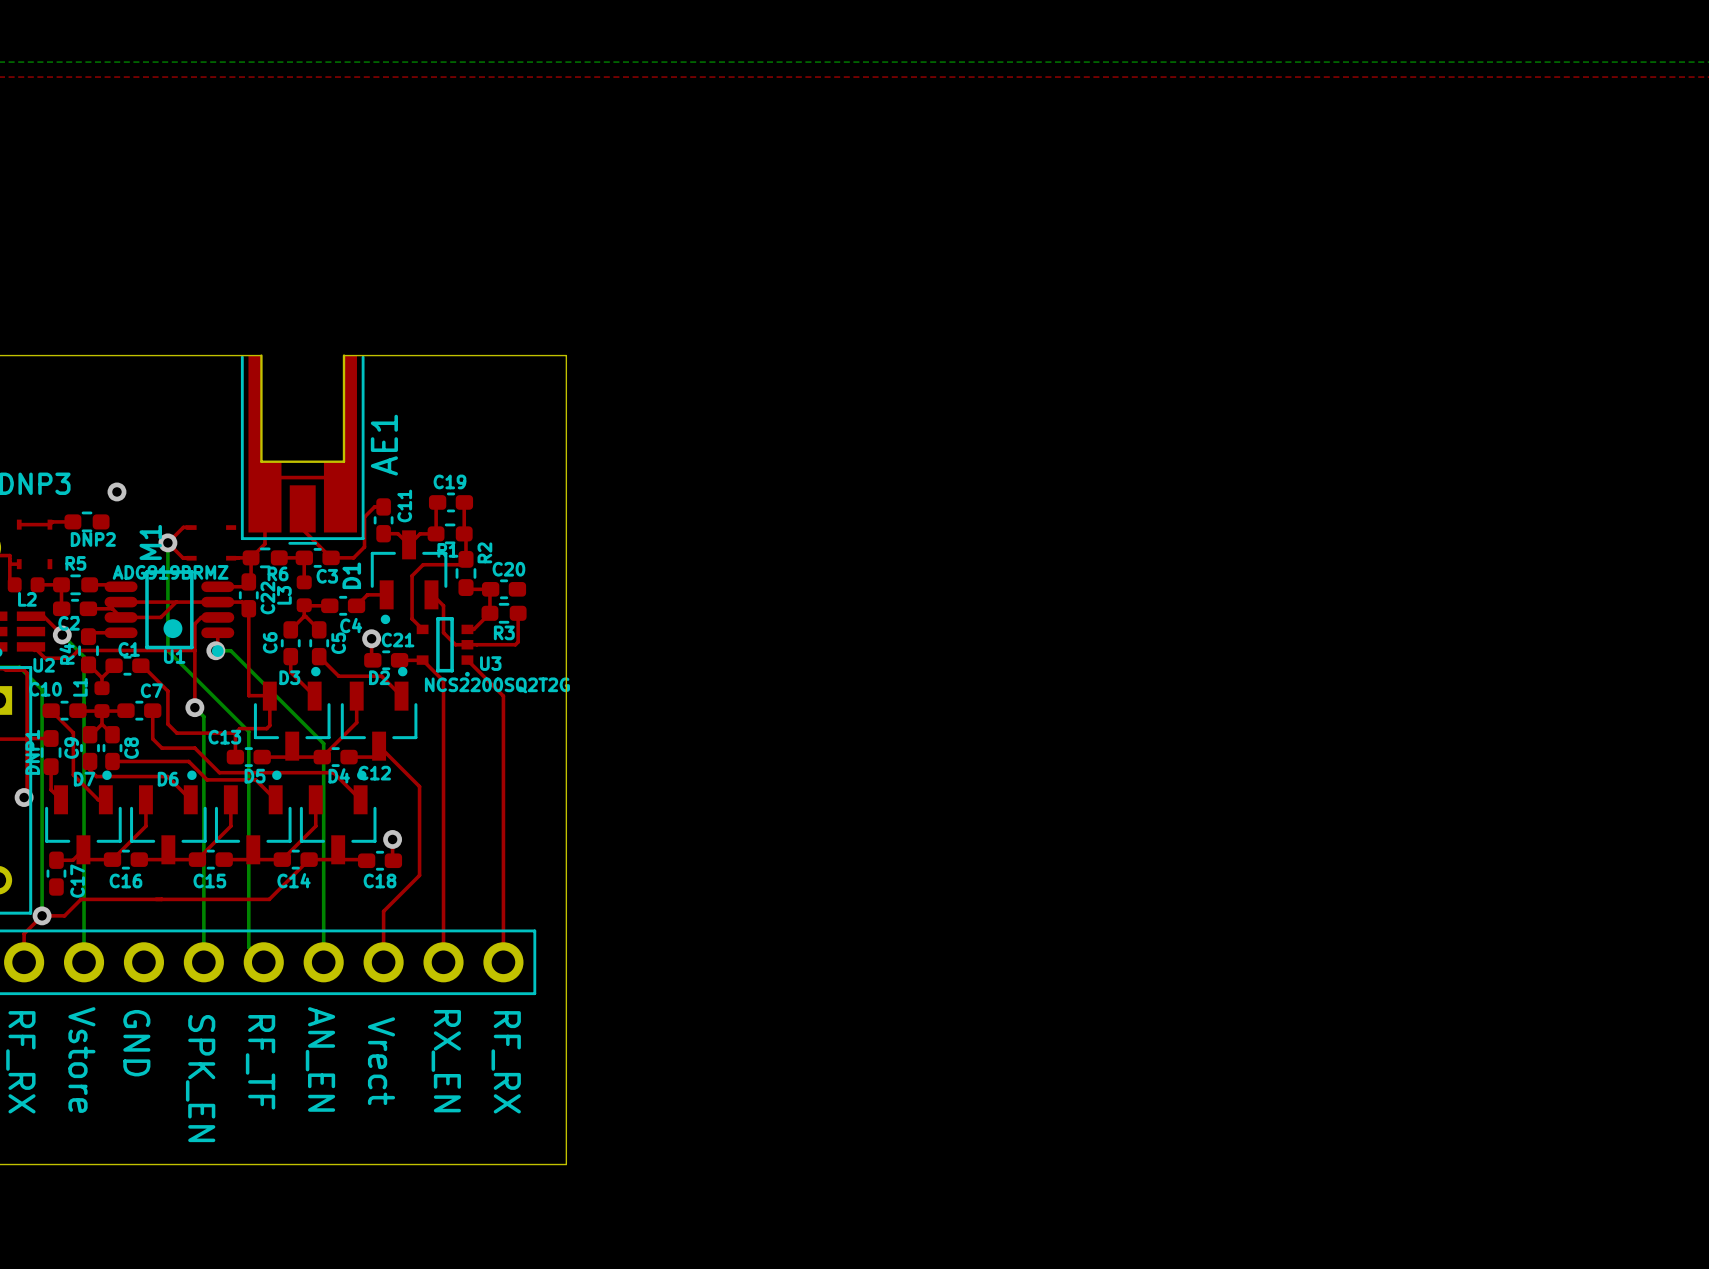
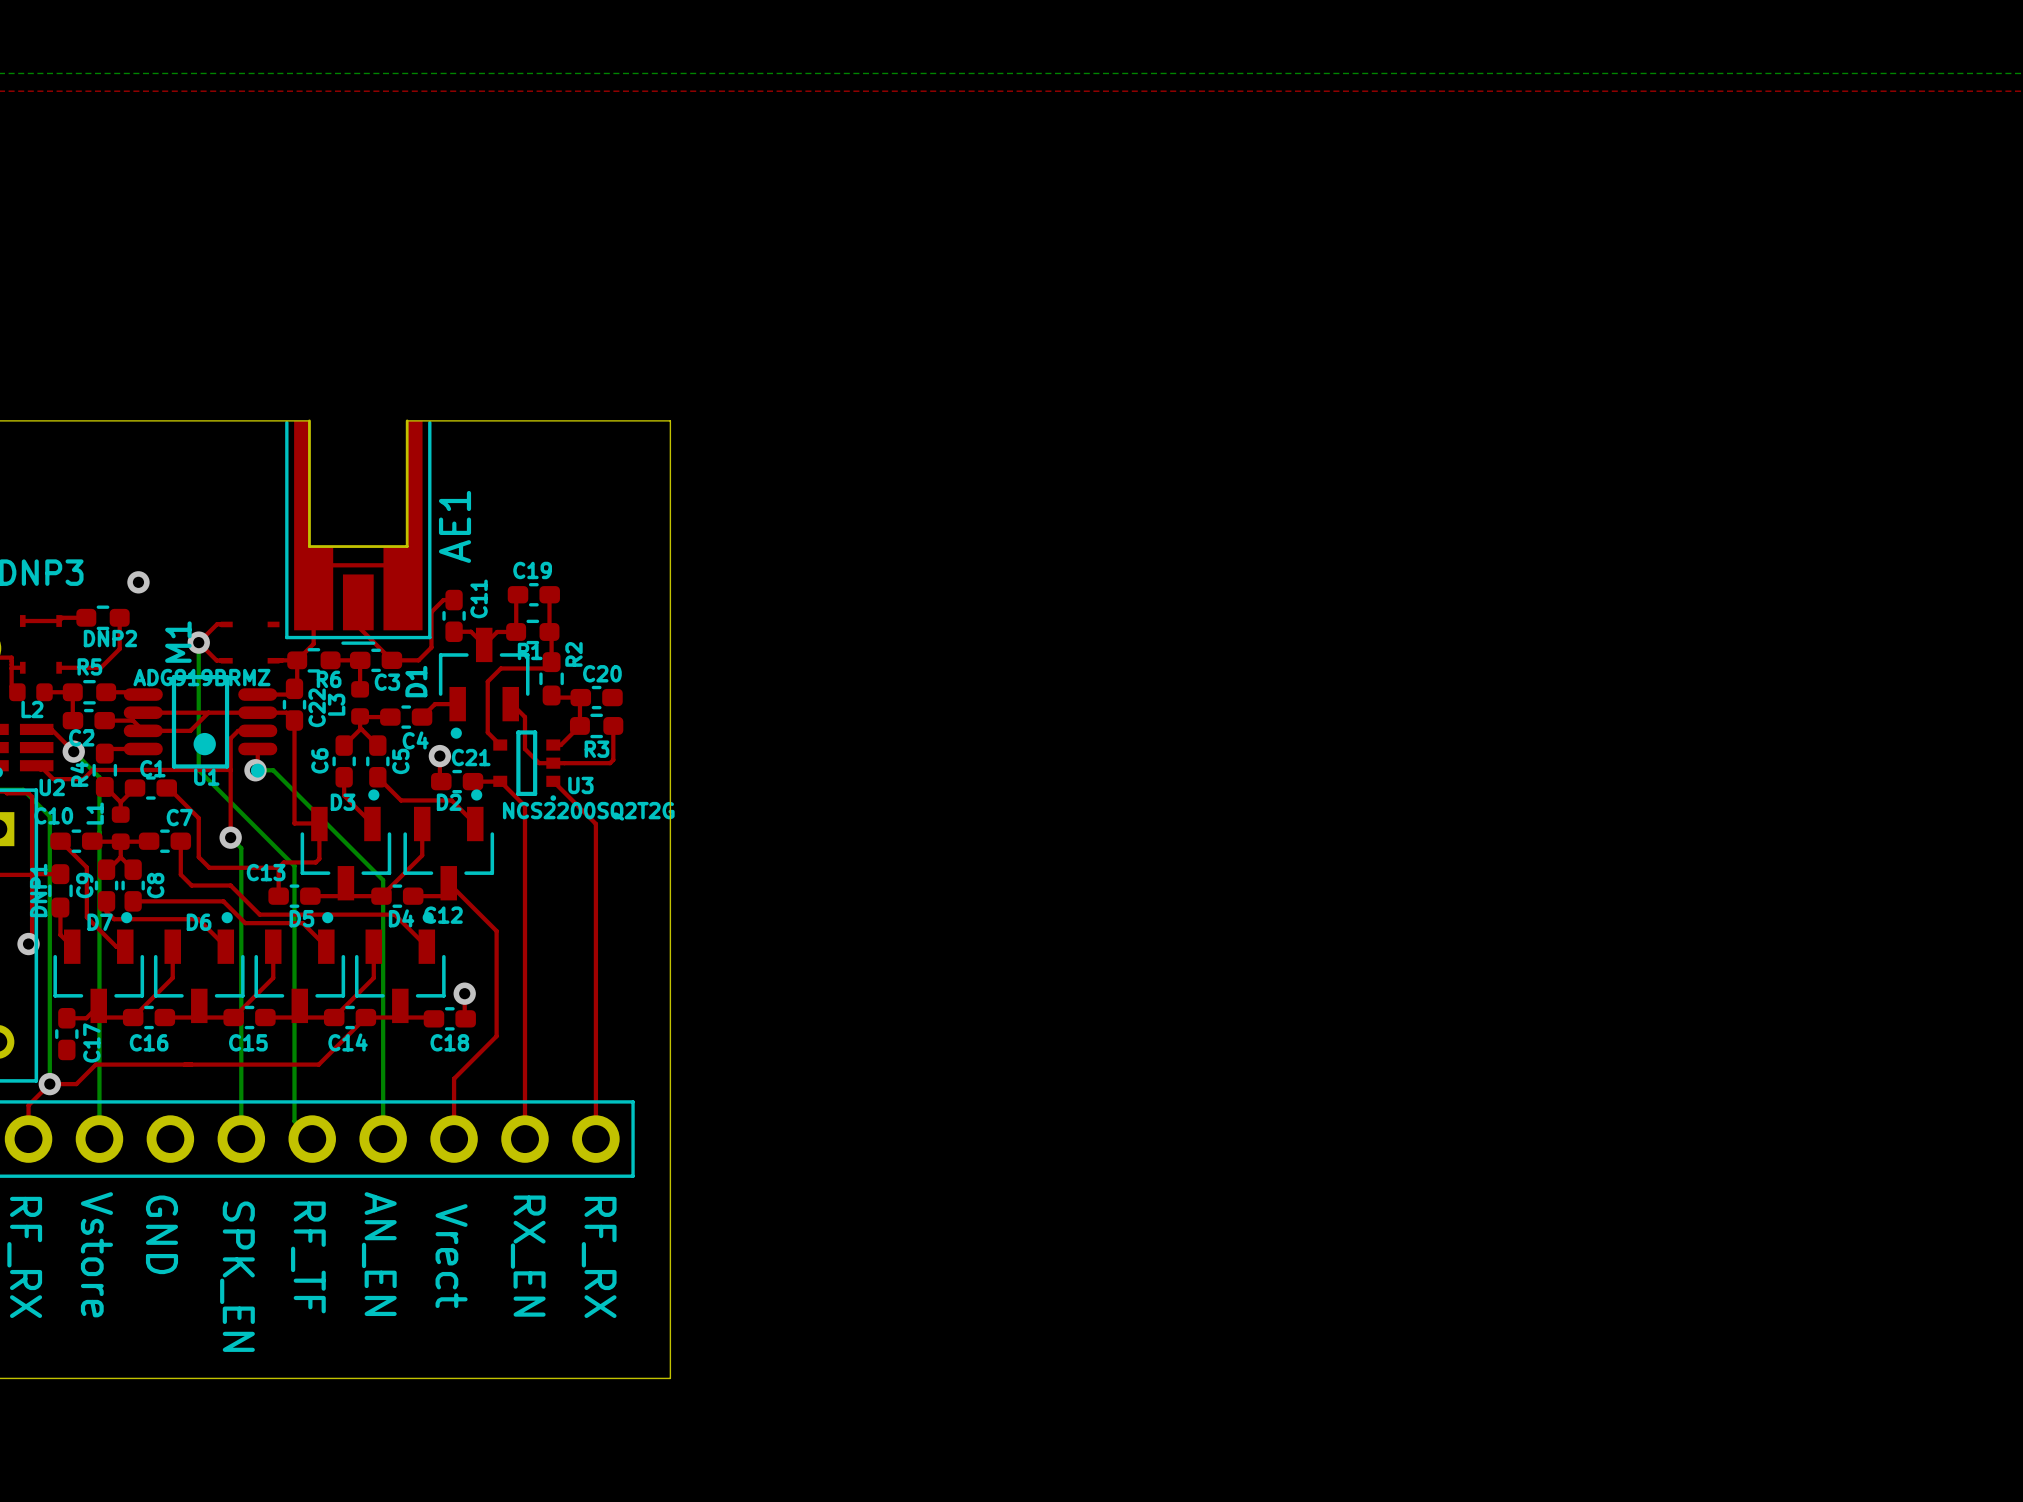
top track: none -> (119, 617) (119, 648) (100, 667) (59, 667)

